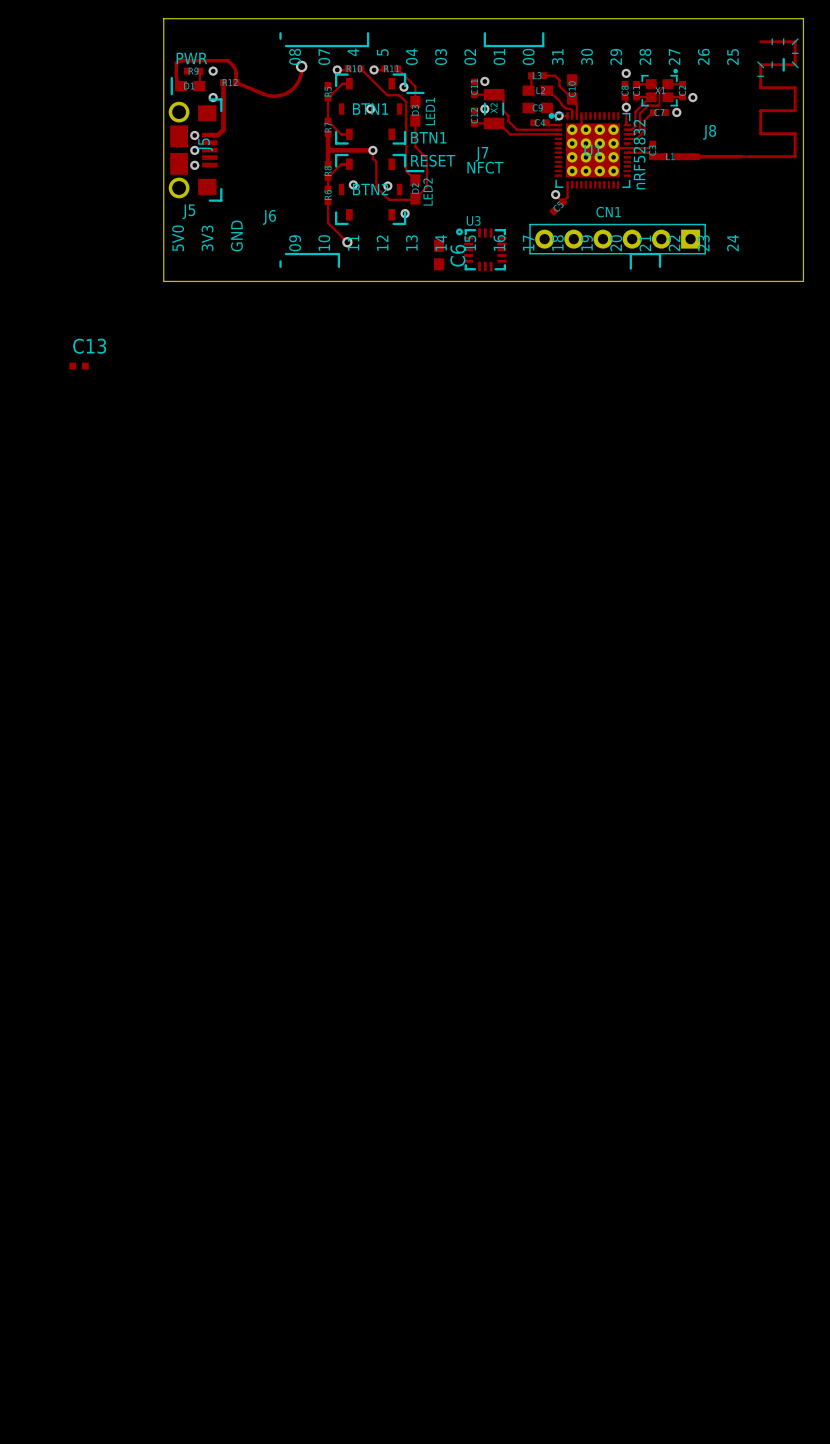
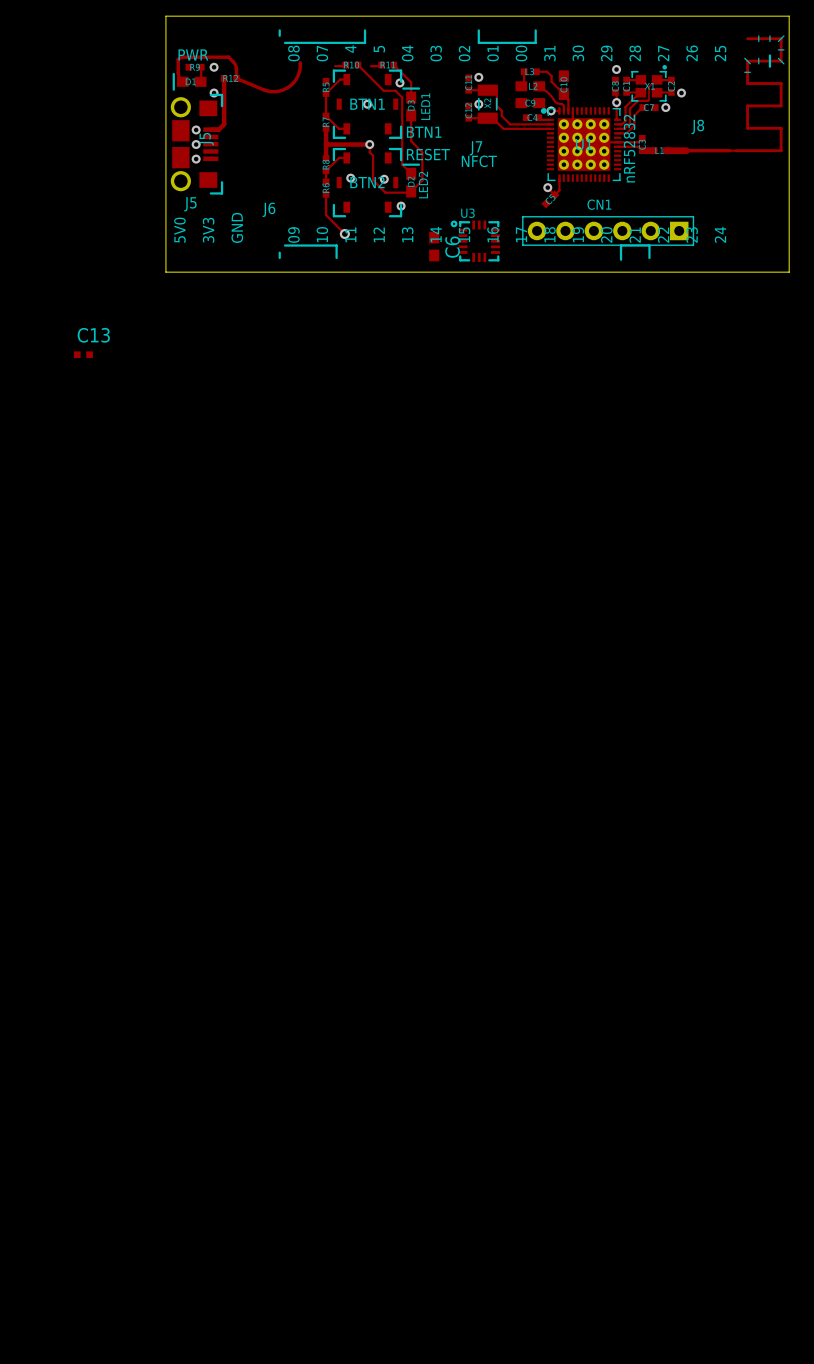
via: (301, 66) -> none
via: (337, 69) -> none
via: (374, 69) -> none

